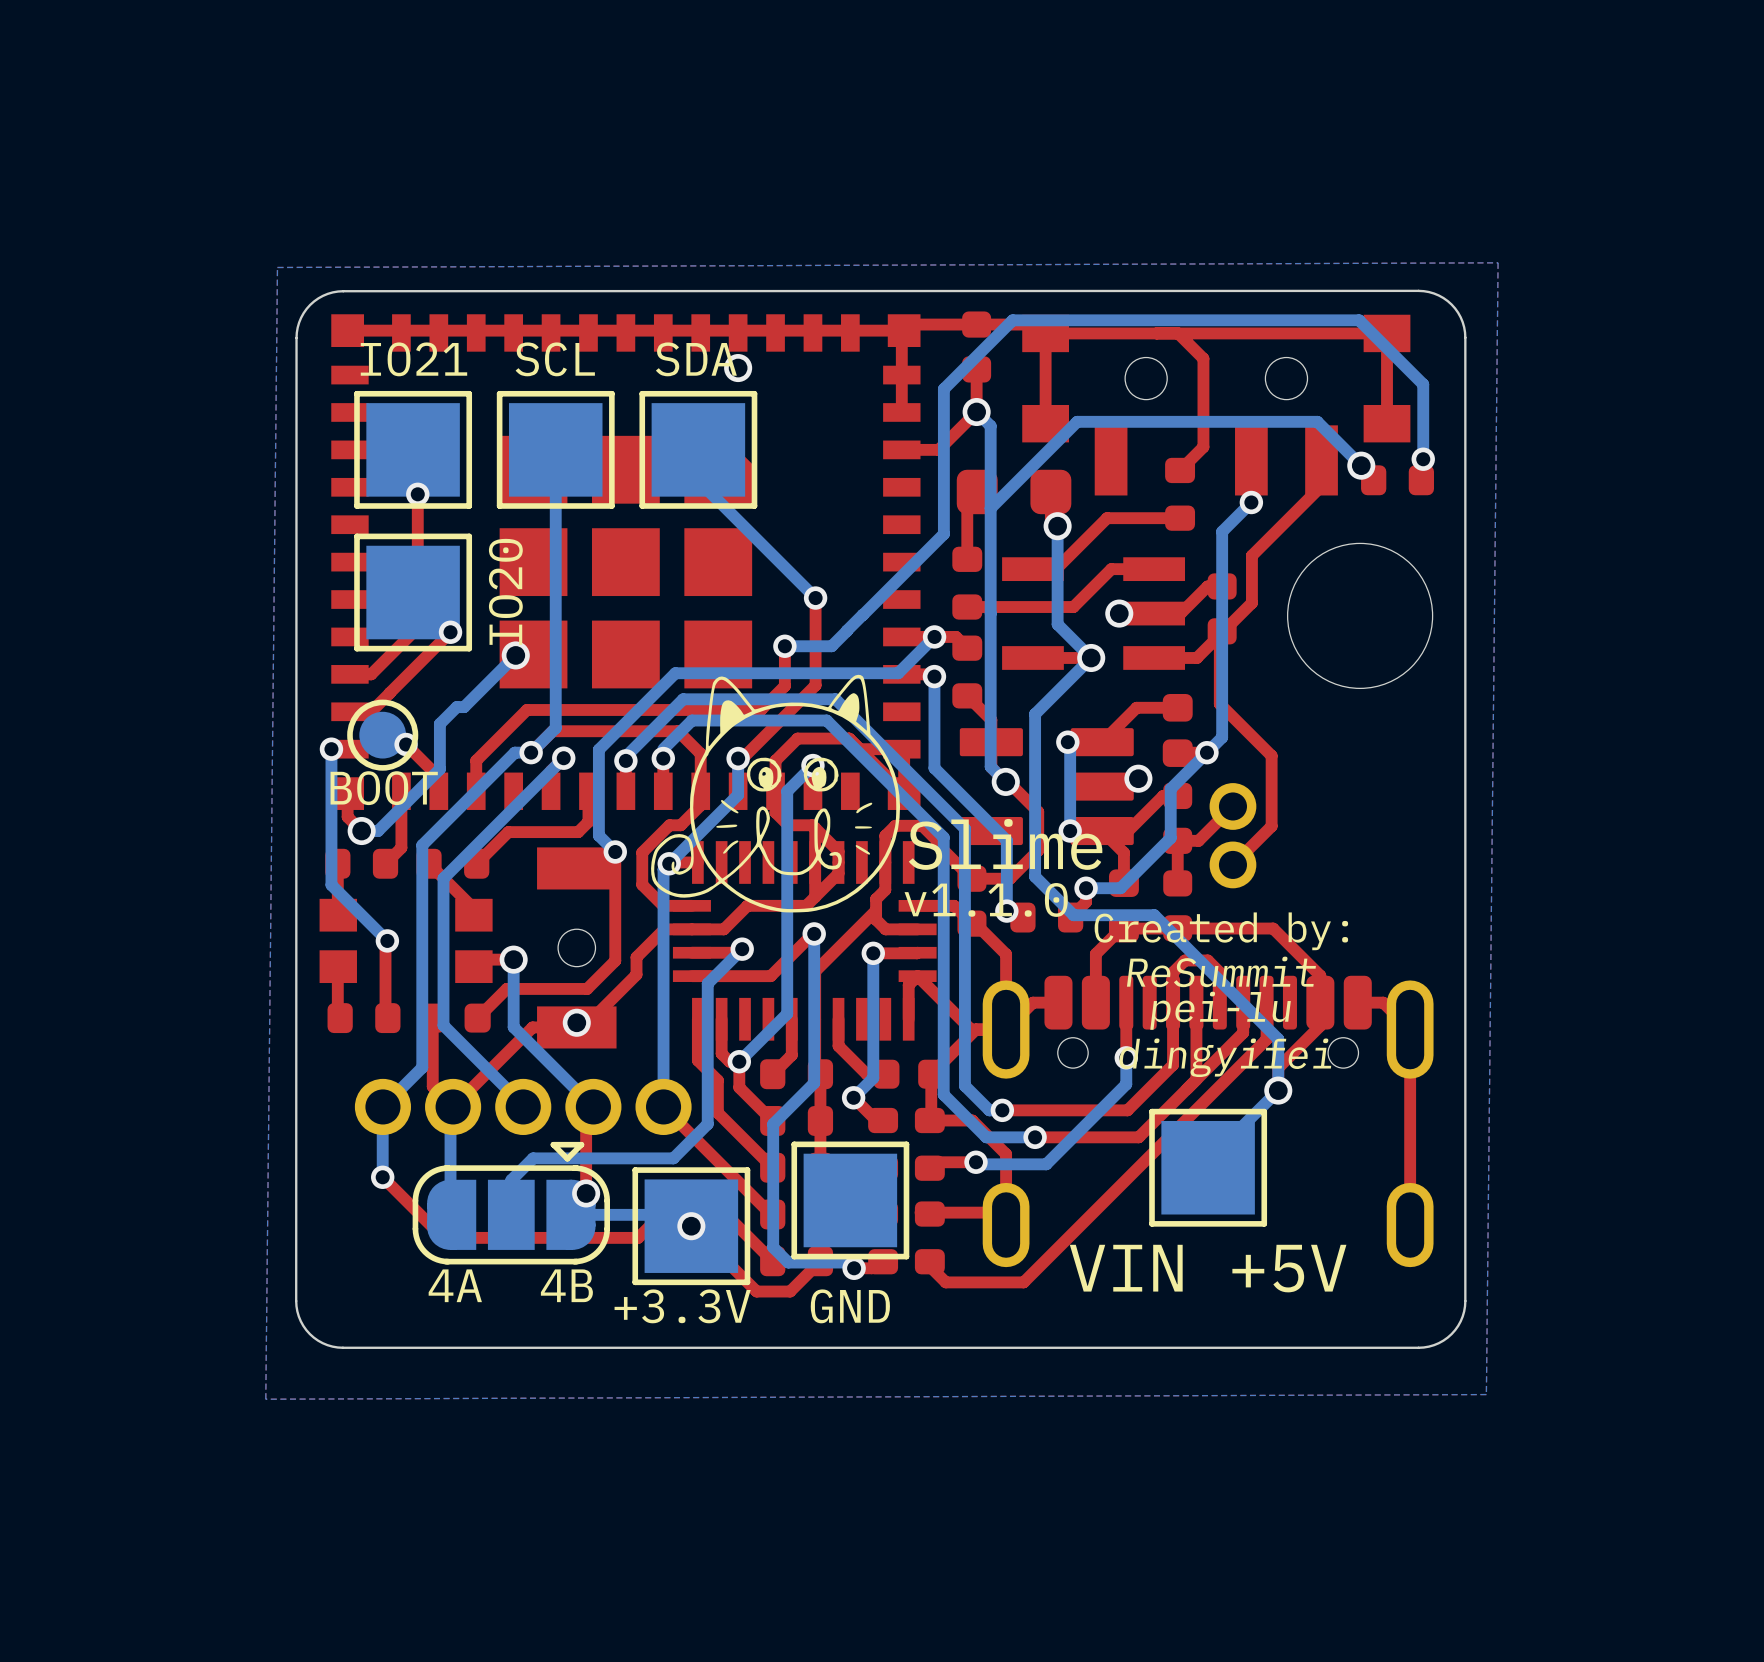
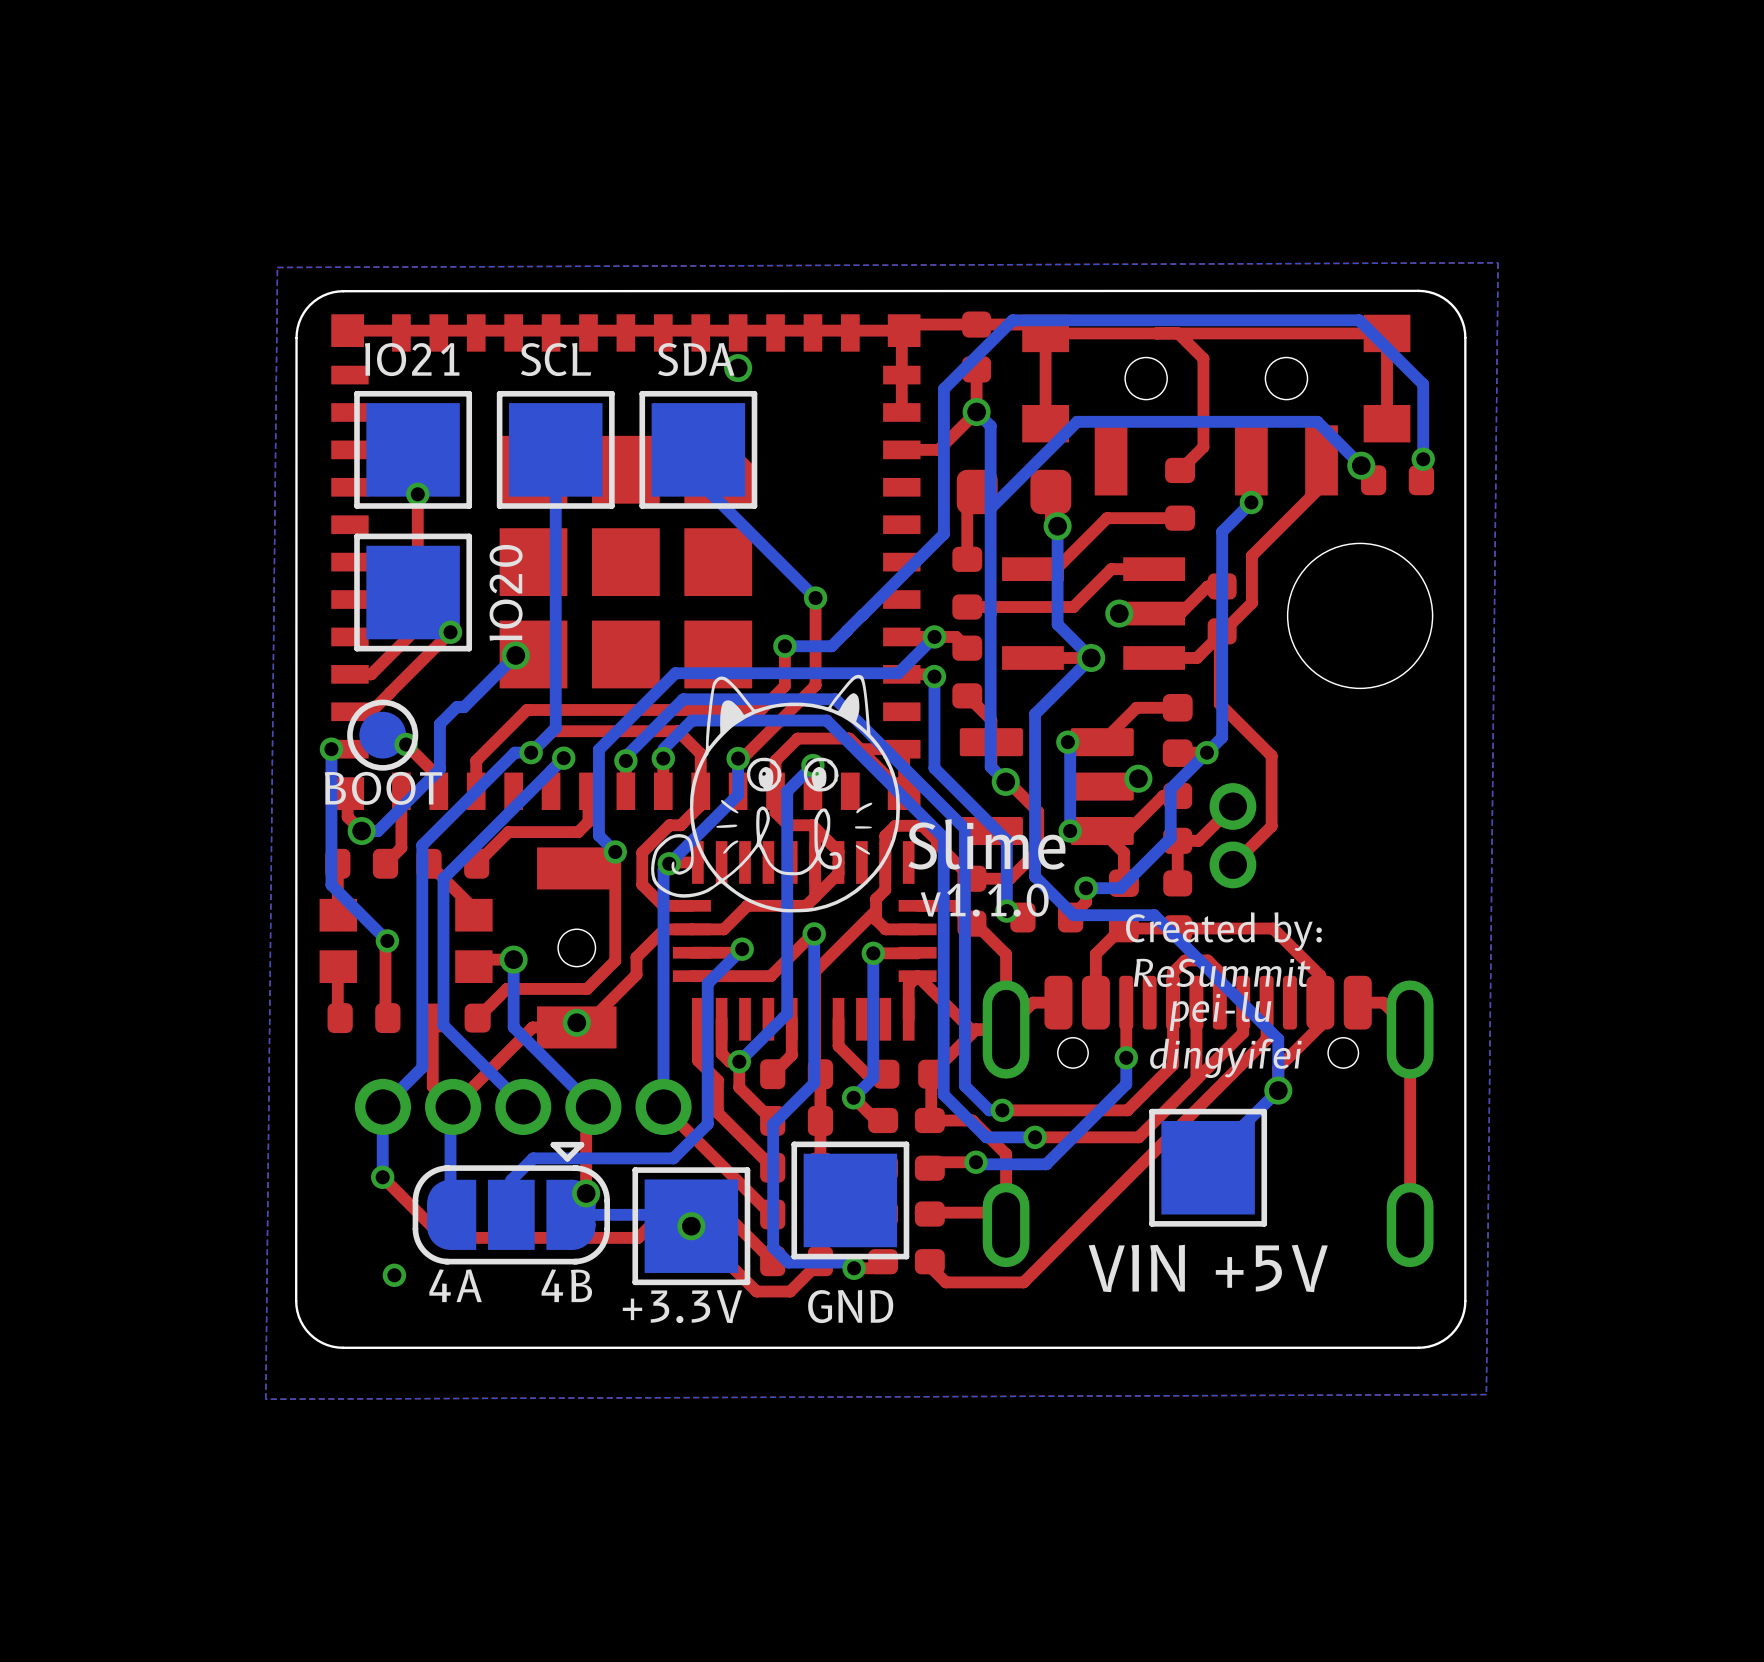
via: none -> (394, 1275)

